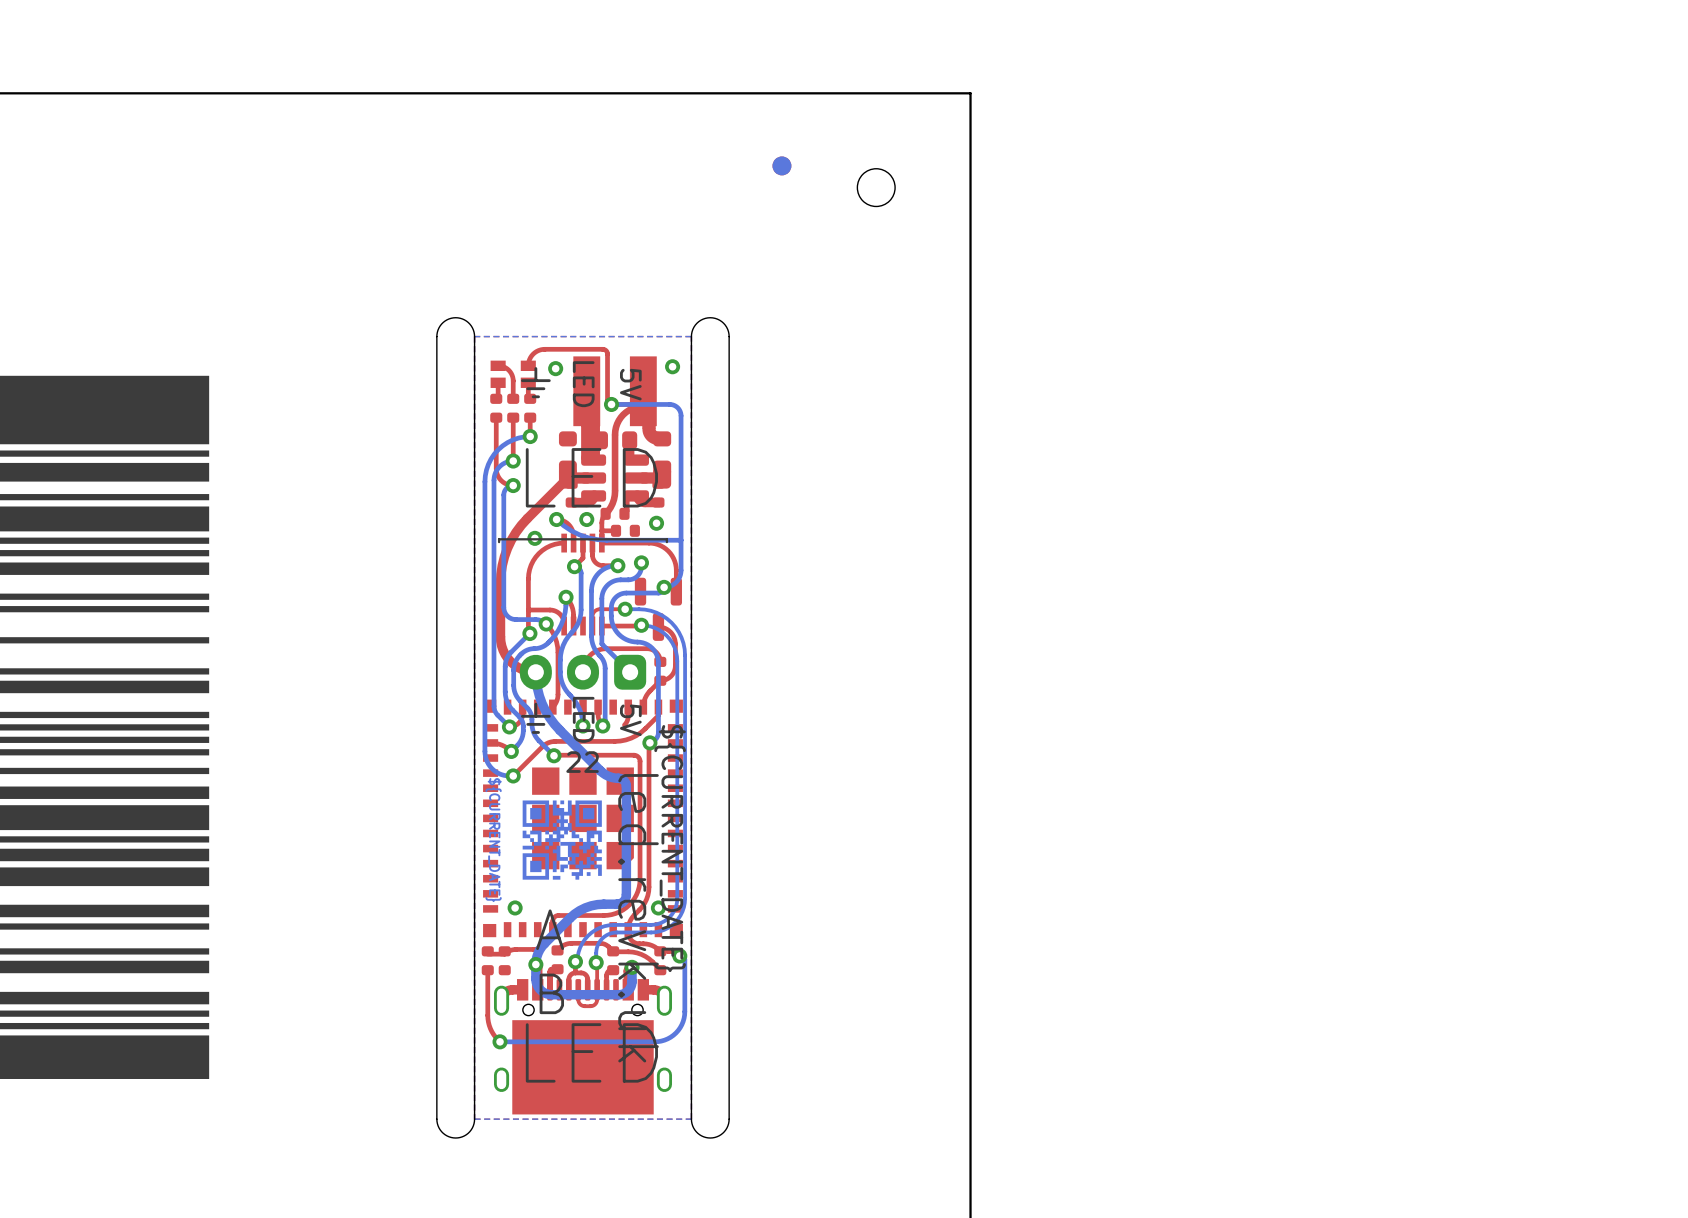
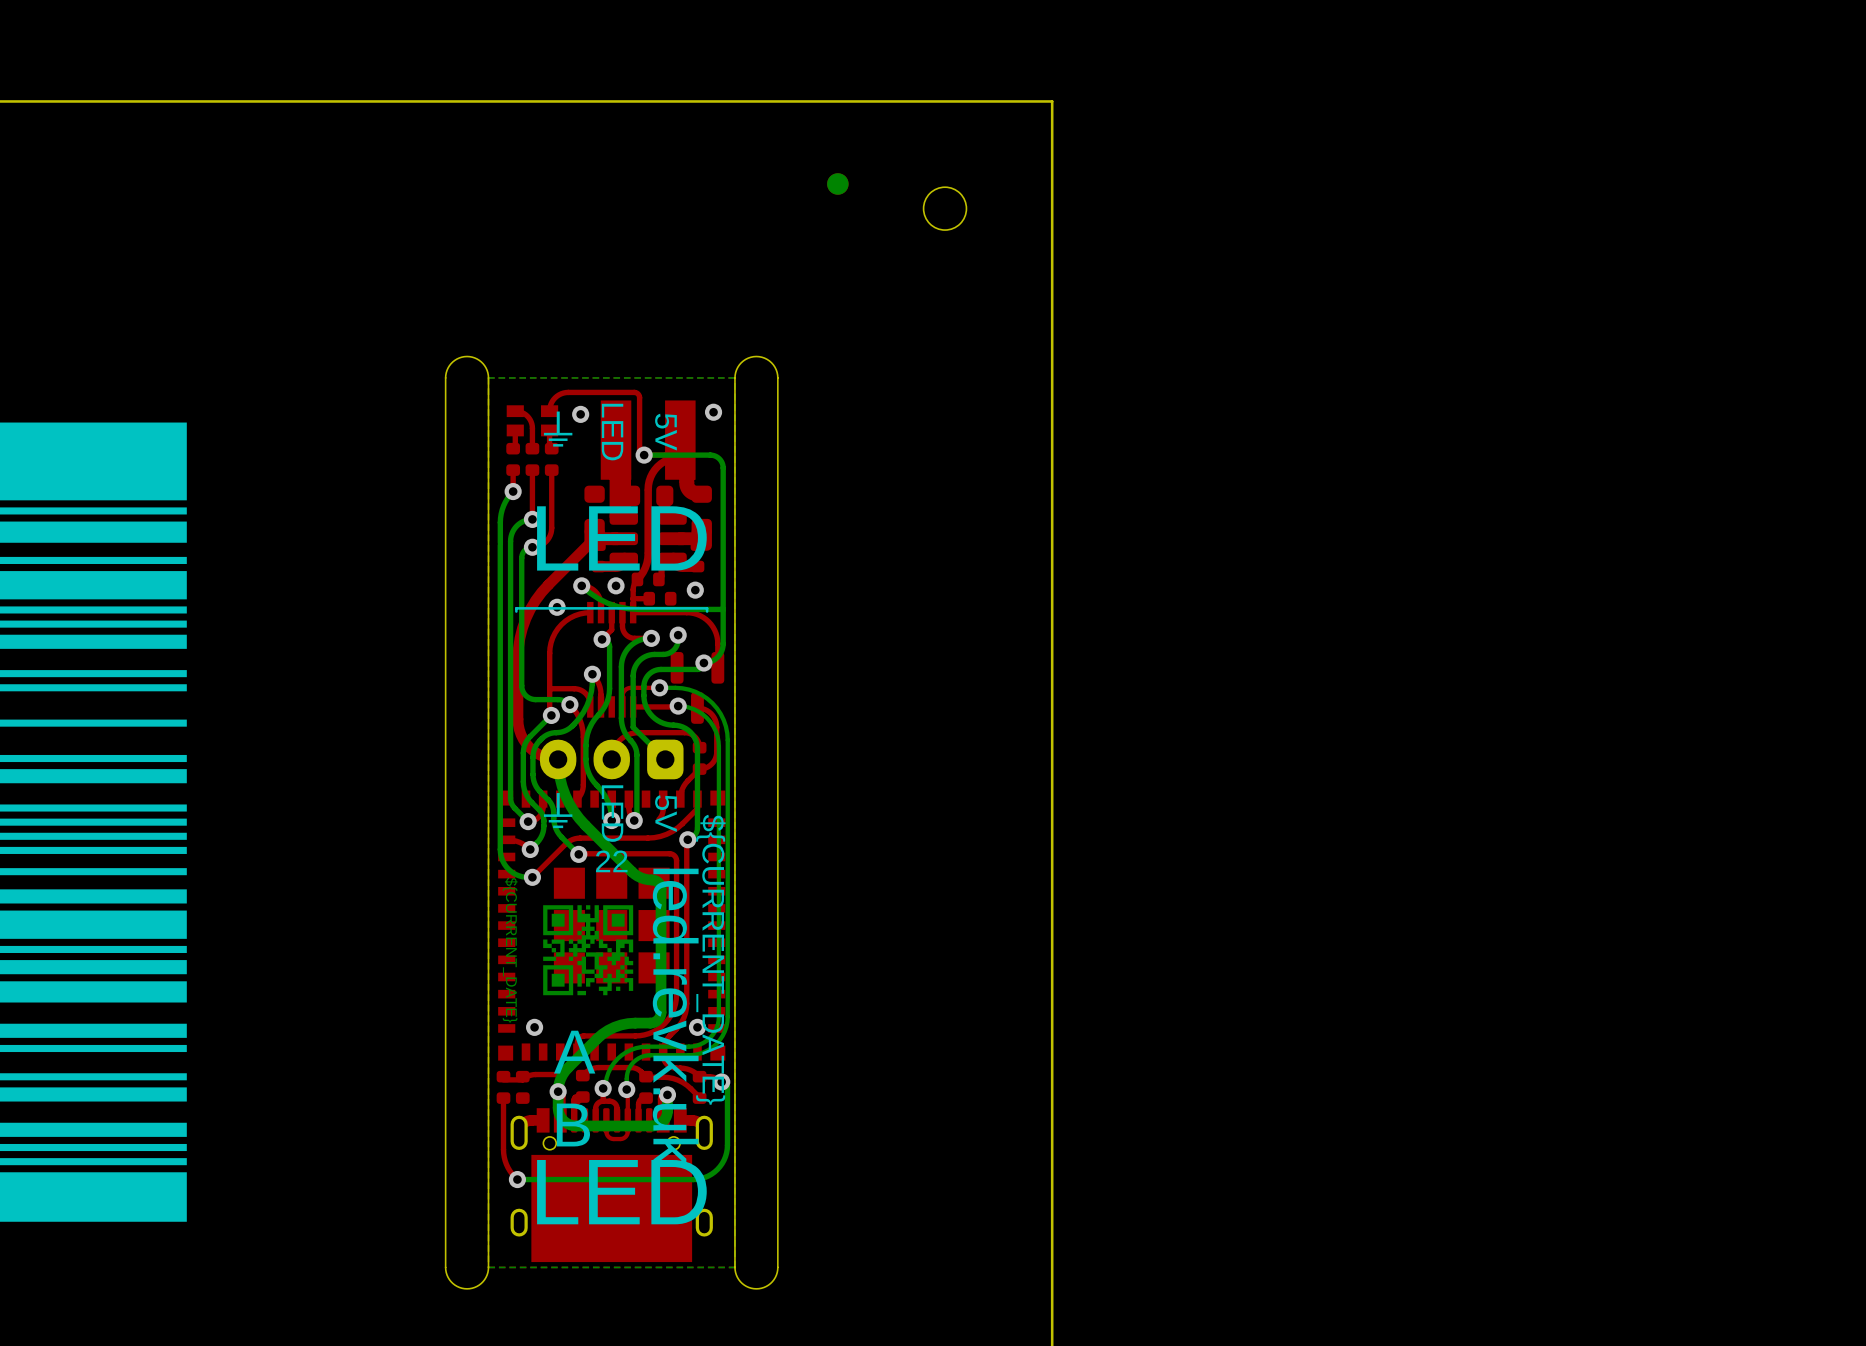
top track: (496, 436) (497, 475) (502, 482) (513, 485) -> (551, 491) (550, 535) (544, 543) (532, 547)
bottom track: none -> (513, 491) (505, 501) (501, 513) (500, 542)
bottom track: (530, 436) (512, 439) (498, 449) (488, 464) (484, 483) -> none
via position: (530, 436) -> (513, 491)

